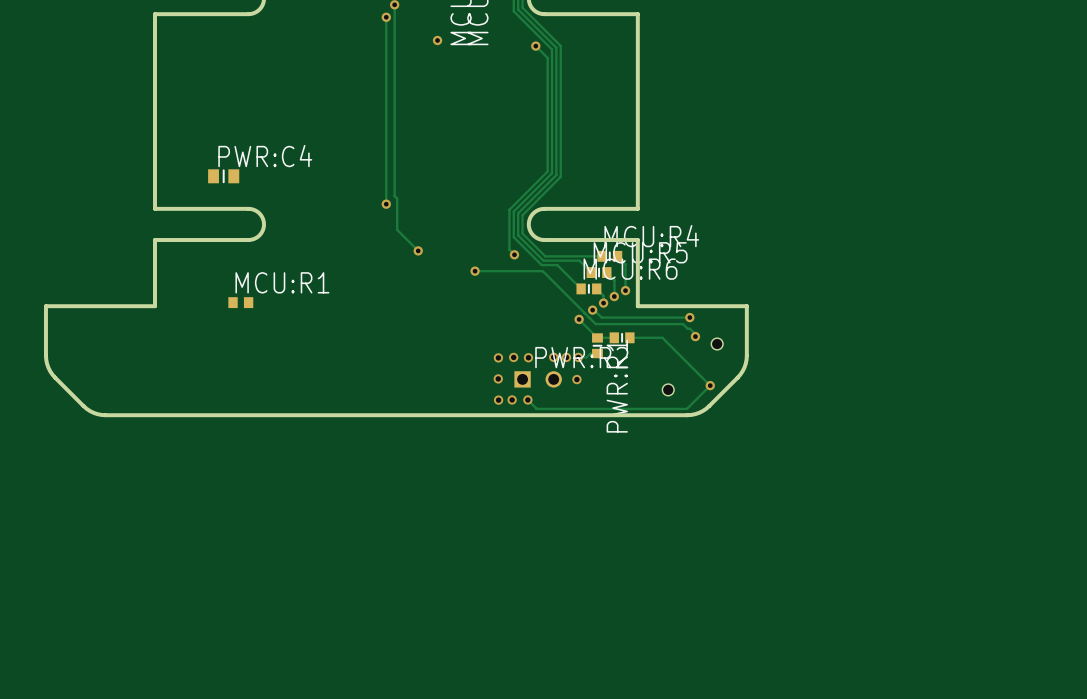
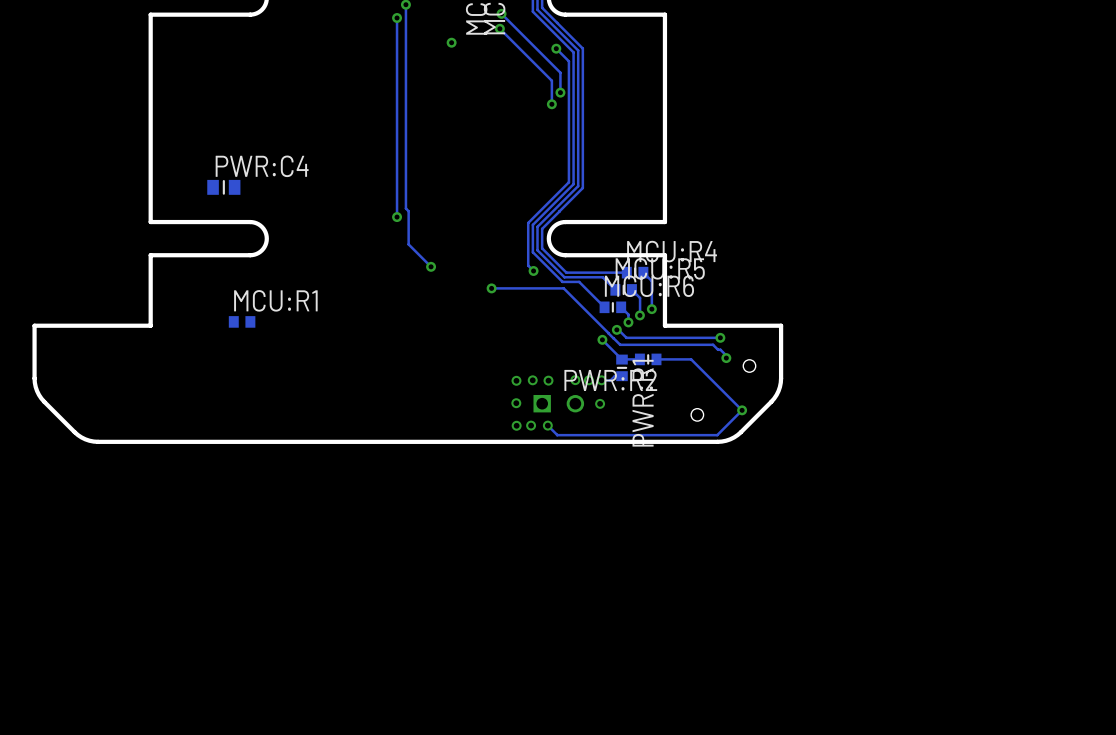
track: none -> (501, 13) (560, 72) (560, 92)
via: none -> (501, 13)
track: none -> (499, 28) (551, 80) (551, 104)
via: none -> (499, 28)
via: none -> (560, 92)
via: none -> (551, 104)

